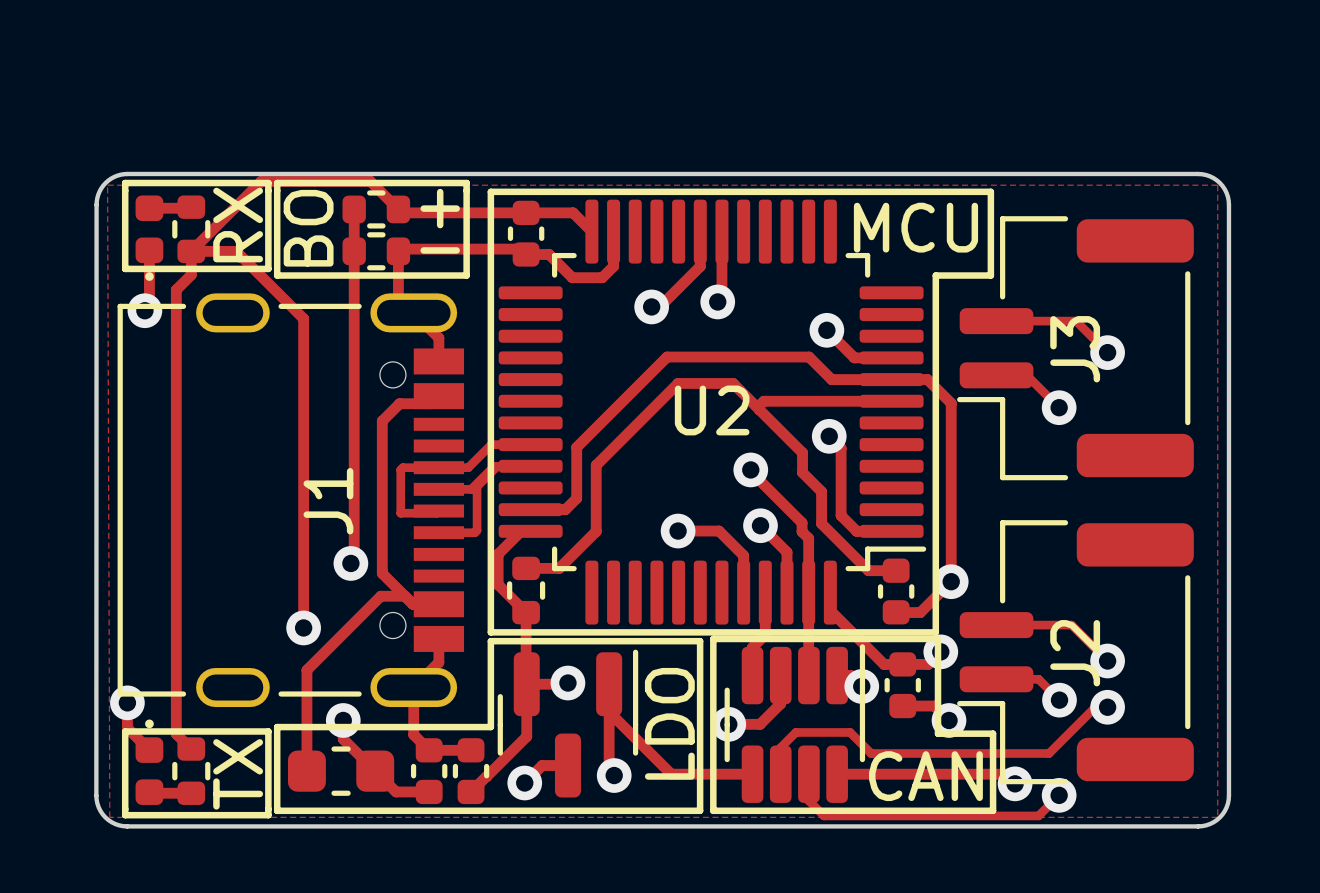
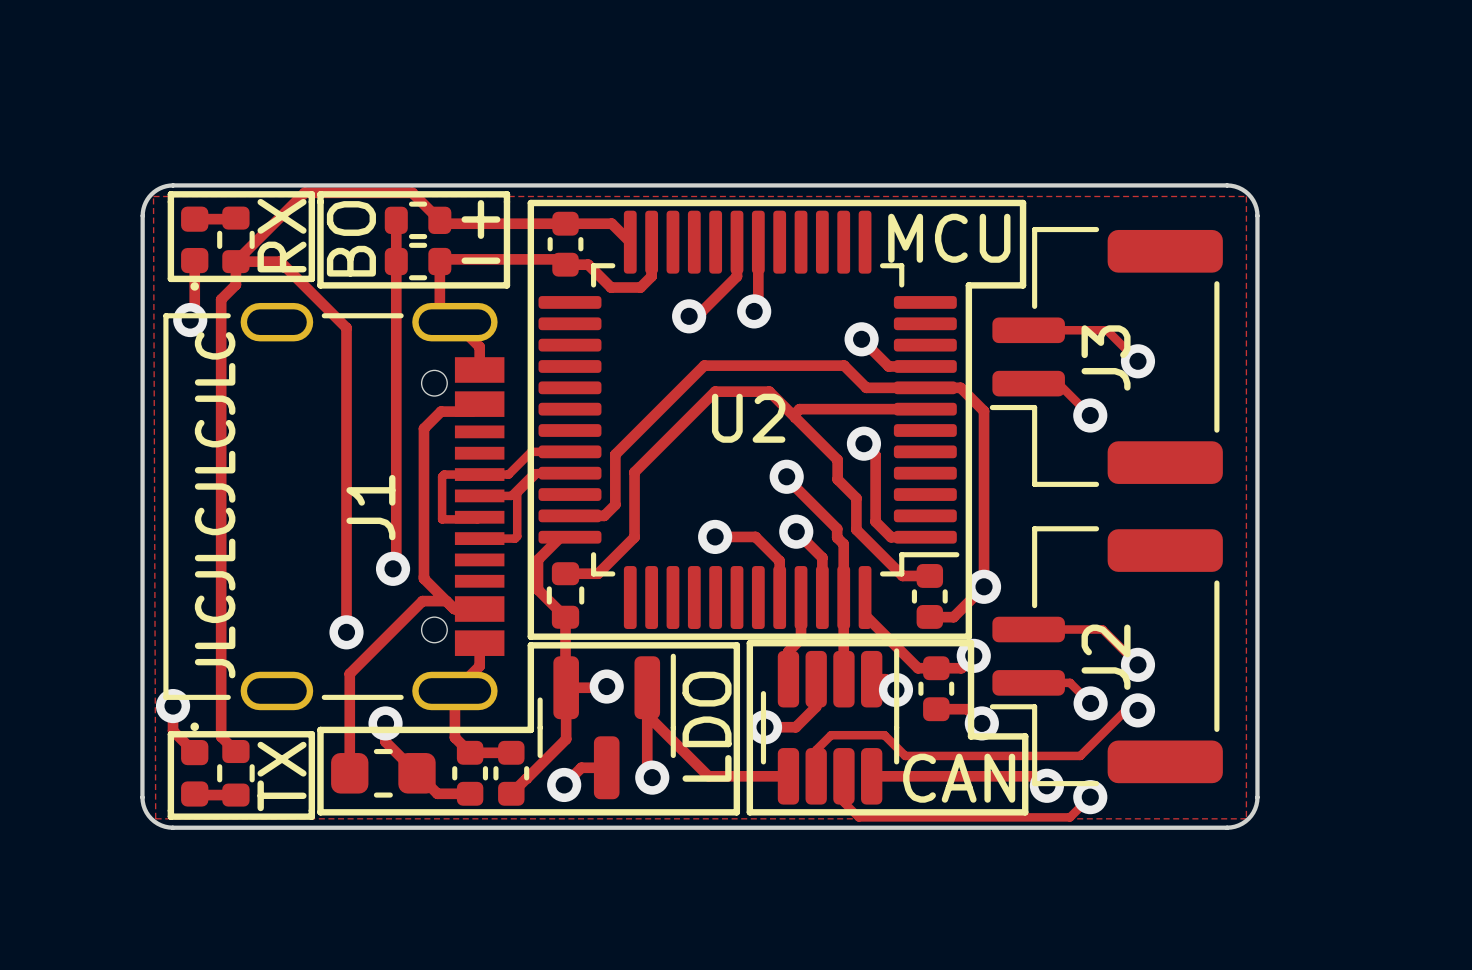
text: none -> JLCJLCJLCJLC (215, 505)

